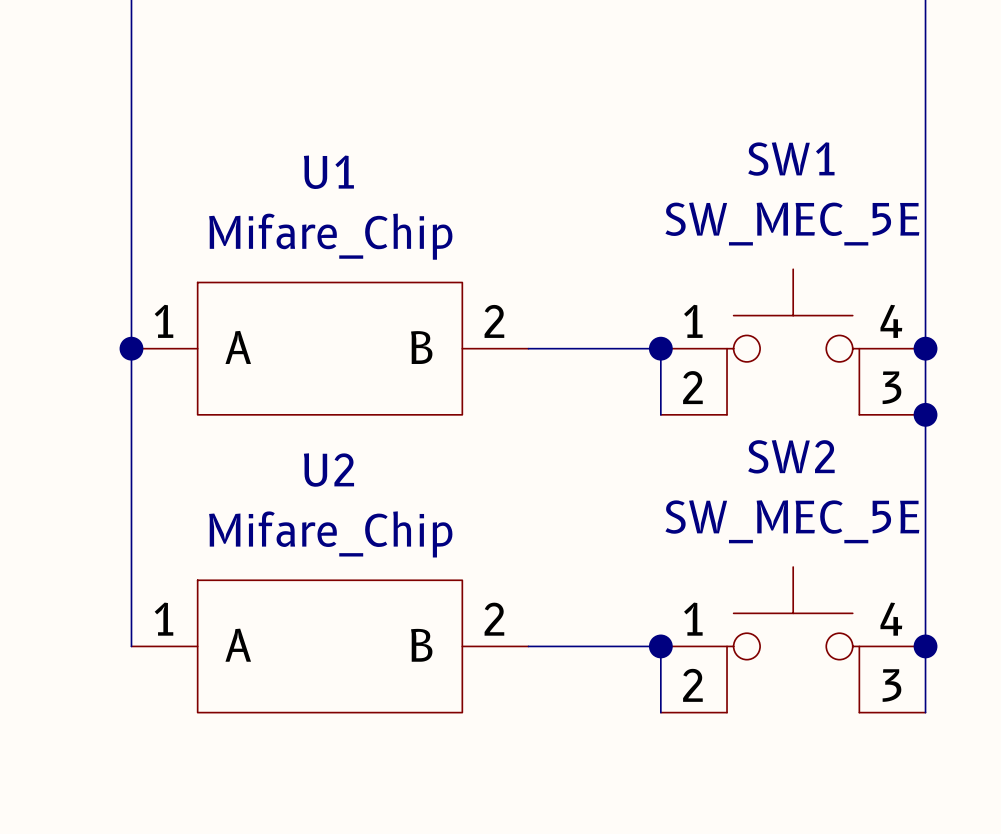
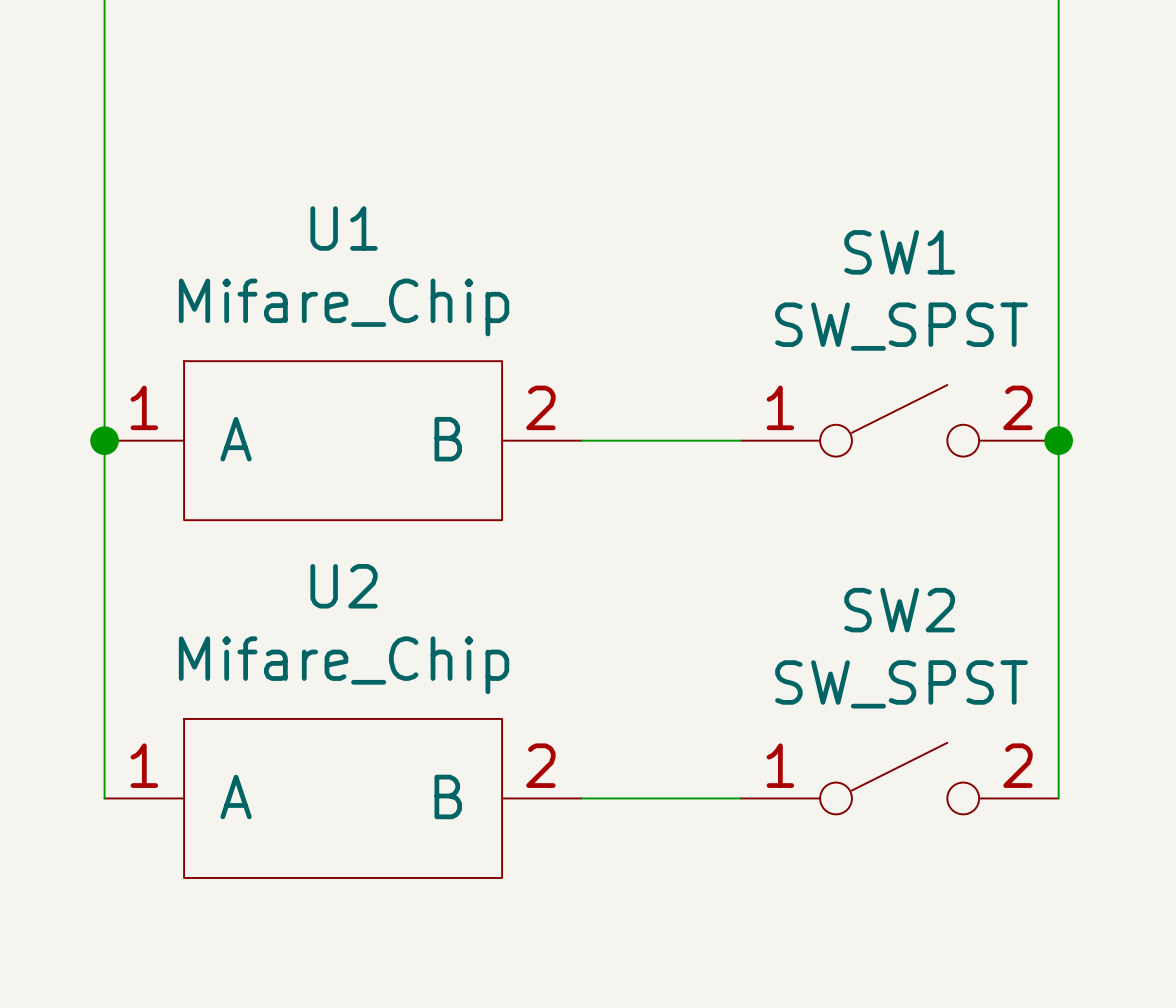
SW1 value: SW_MEC_5E (792, 224) -> SW_SPST (901, 326)
SW1 symbol: [660, 269, 926, 415] -> [740, 385, 1059, 457]
wire: (660, 348) (660, 414) -> none
junction: (660, 348) -> none
junction: (925, 414) -> none
SW2 value: SW_MEC_5E (792, 521) -> SW_SPST (901, 684)
SW2 symbol: [660, 567, 926, 713] -> [740, 742, 1059, 815]
wire: (660, 646) (660, 712) -> none
junction: (660, 646) -> none
wire: (925, 646) (925, 712) -> none
junction: (925, 646) -> none

